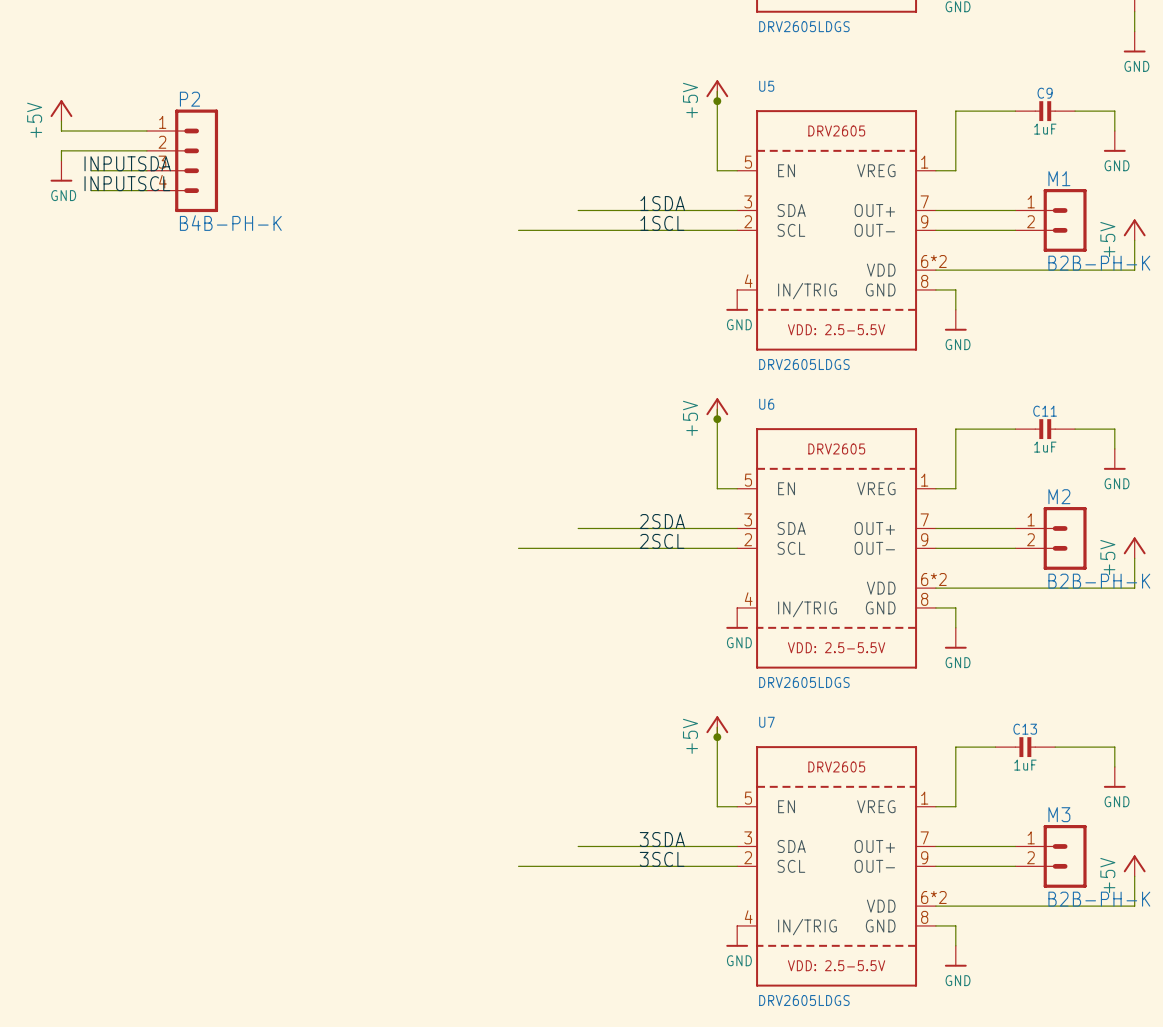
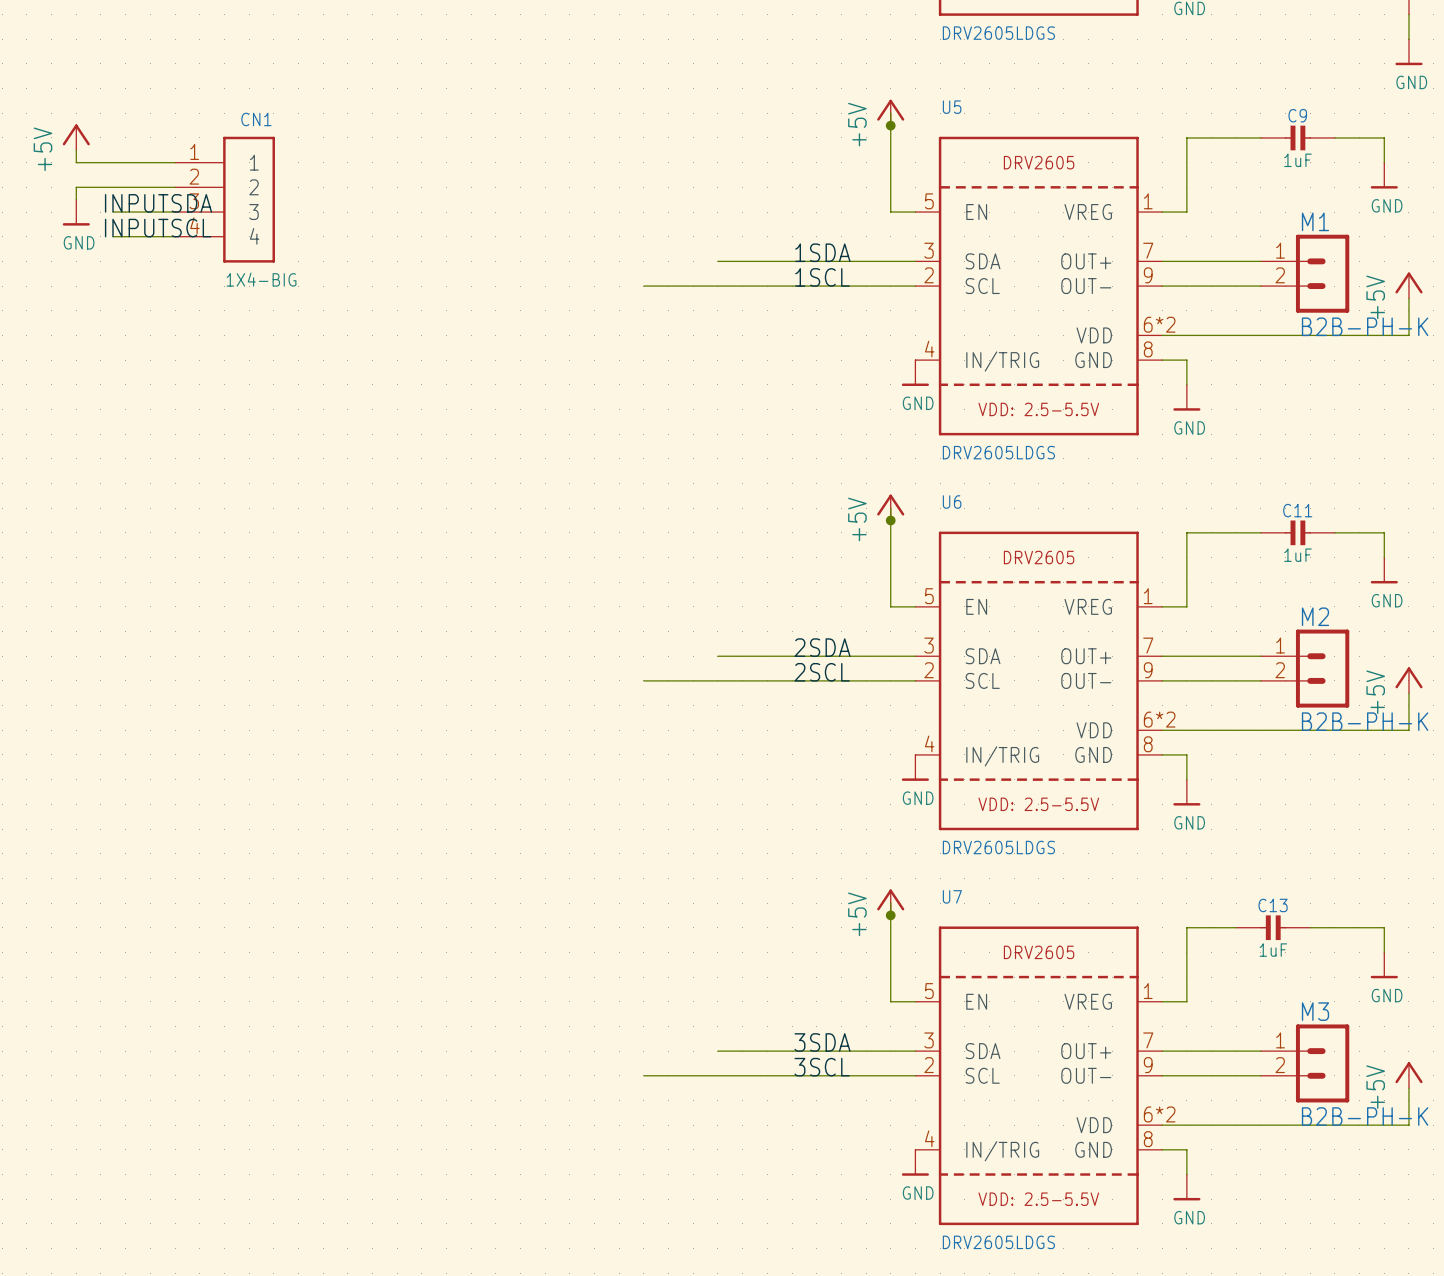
CN1: none -> 1X4-BIG (225, 199)
P2: B4B-PH-K (182, 160) -> none

